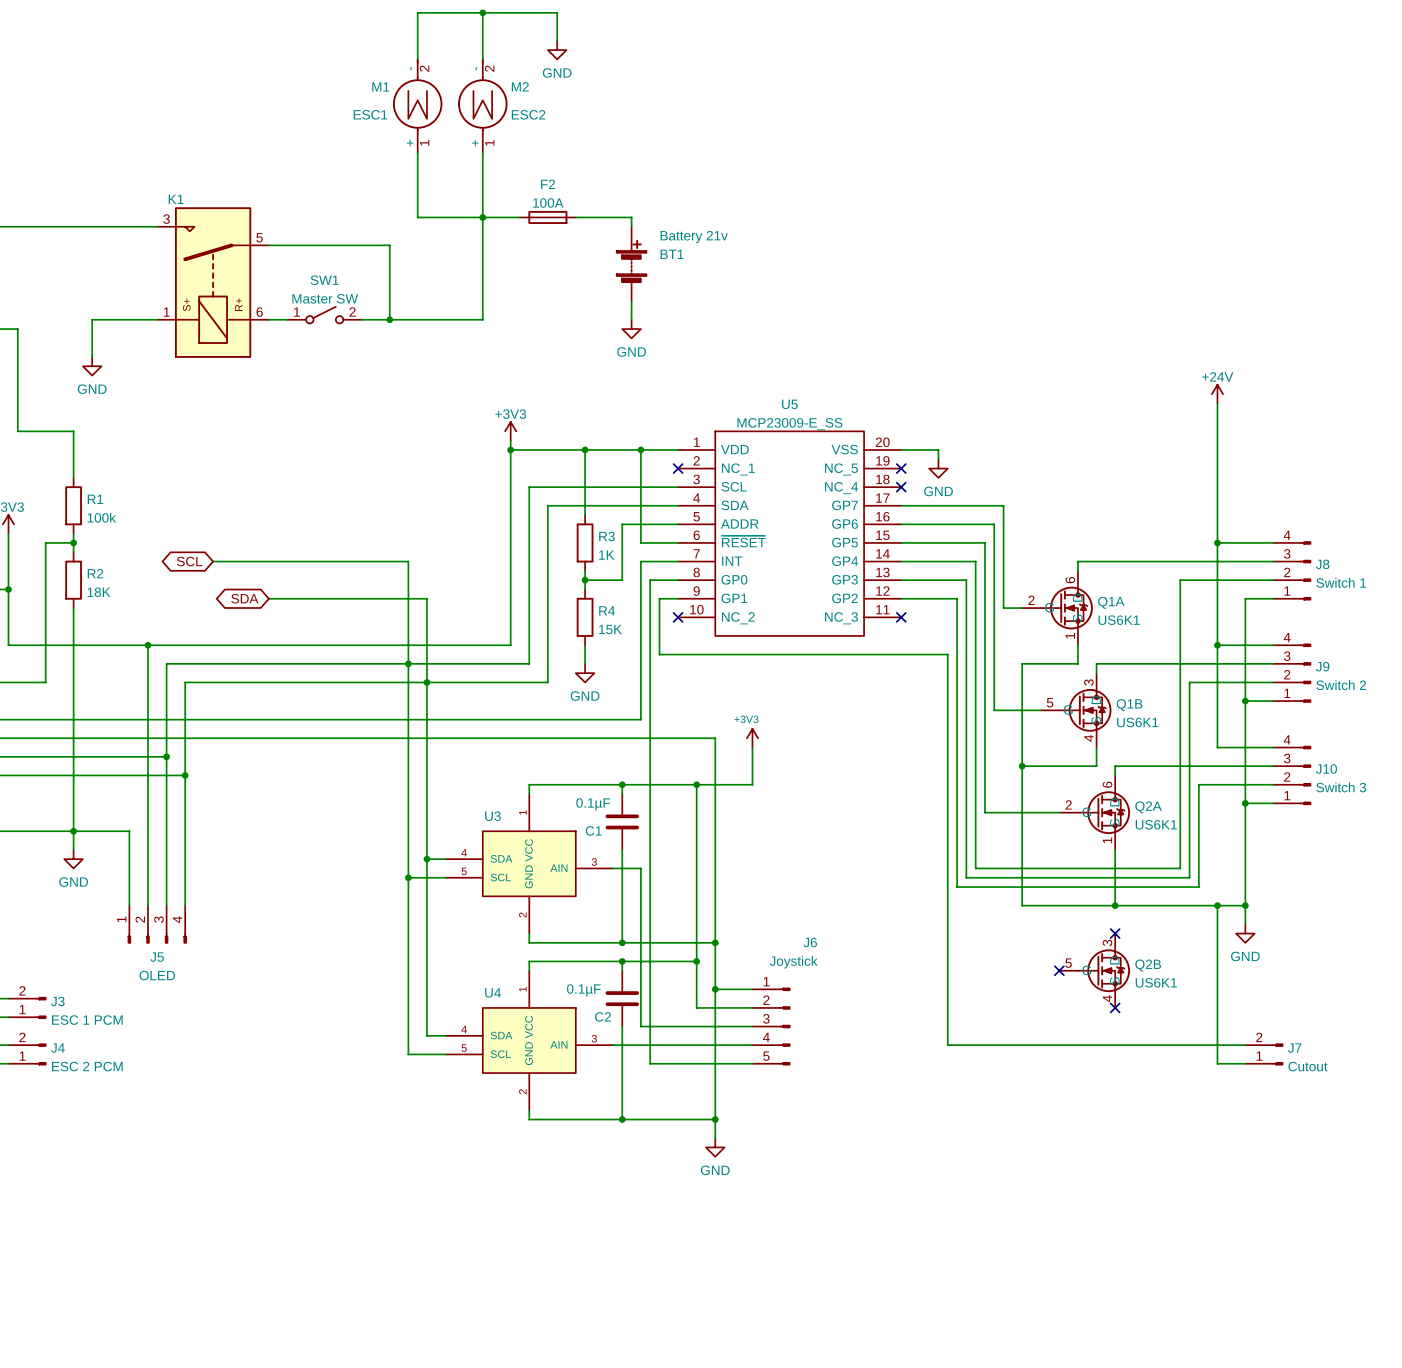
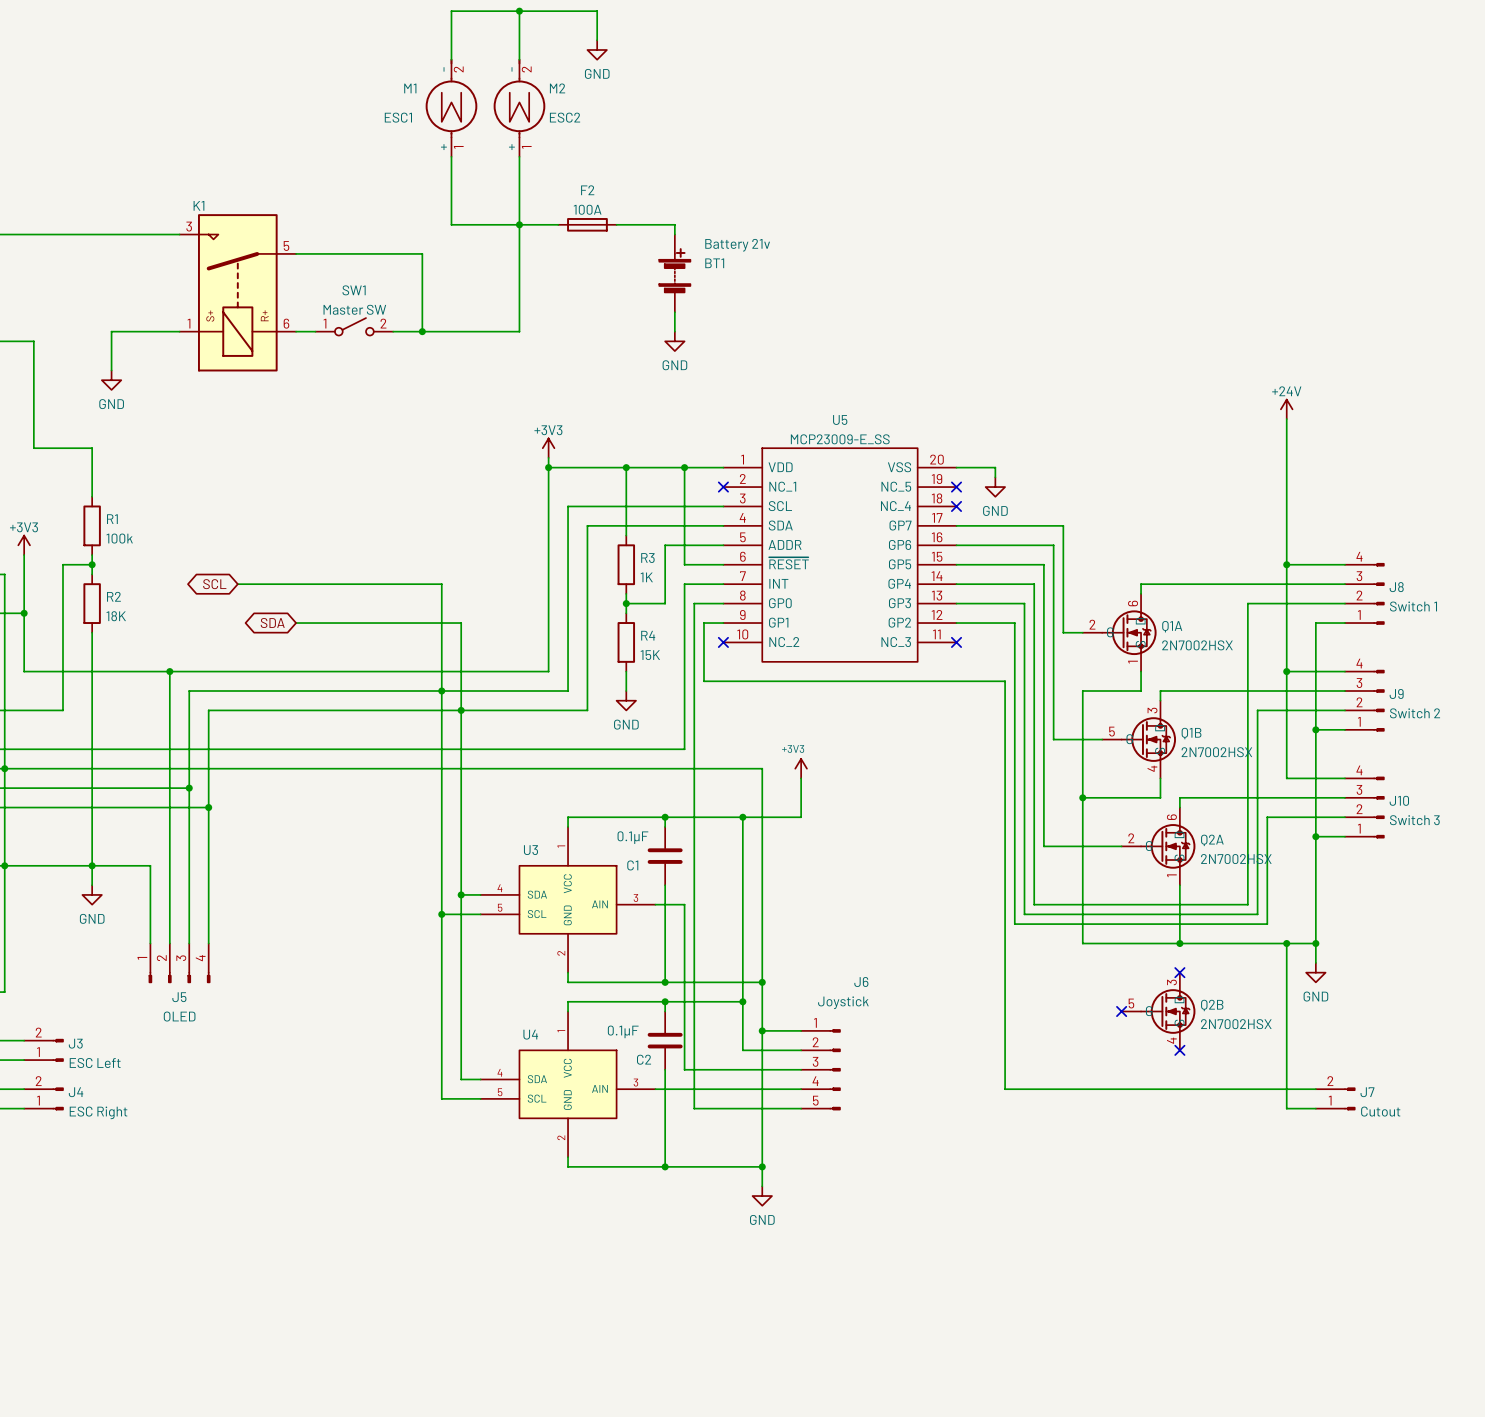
Q1A value: US6K1 (1119, 620) -> 2N7002HSX (1197, 645)
Q1B value: US6K1 (1137, 722) -> 2N7002HSX (1216, 752)
Q2A value: US6K1 (1156, 824) -> 2N7002HSX (1236, 859)
Q2B value: US6K1 (1156, 982) -> 2N7002HSX (1236, 1024)
J3 value: ESC 1 PCM (87, 1020) -> ESC Left (95, 1063)
J4 value: ESC 2 PCM (87, 1066) -> ESC Right (98, 1112)

